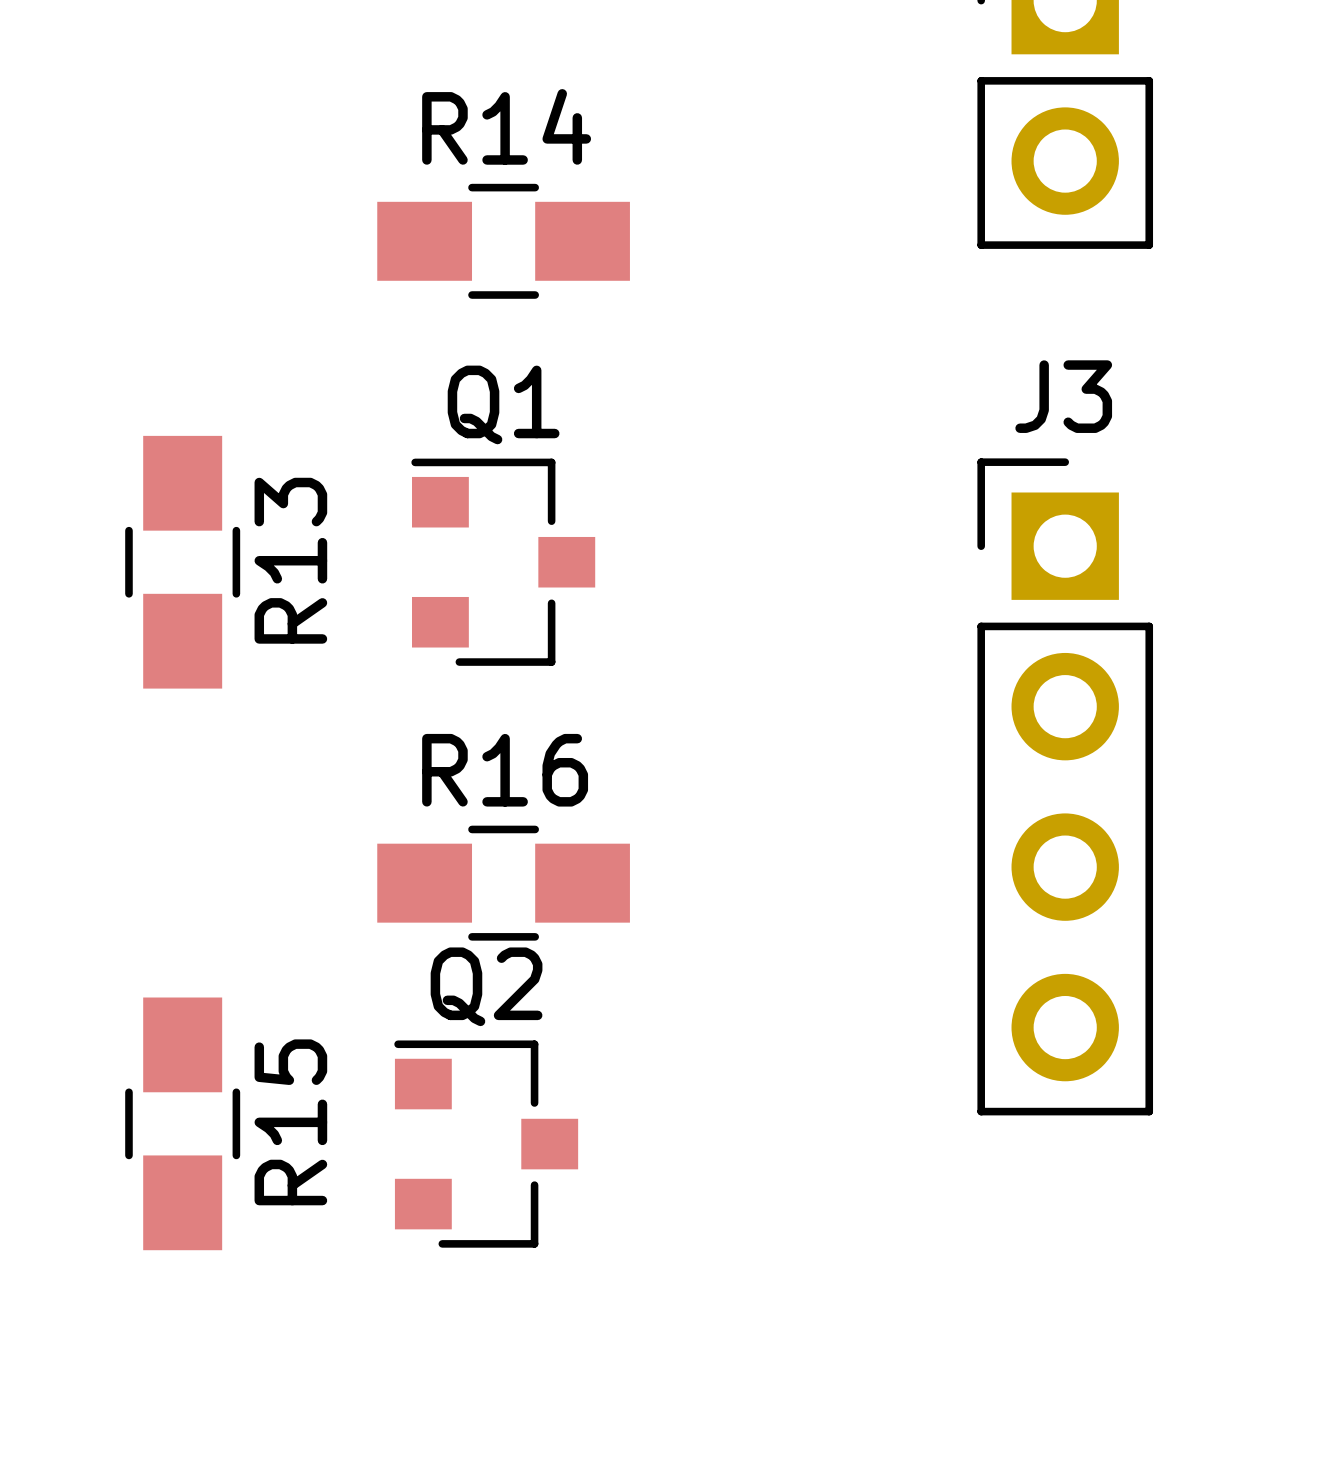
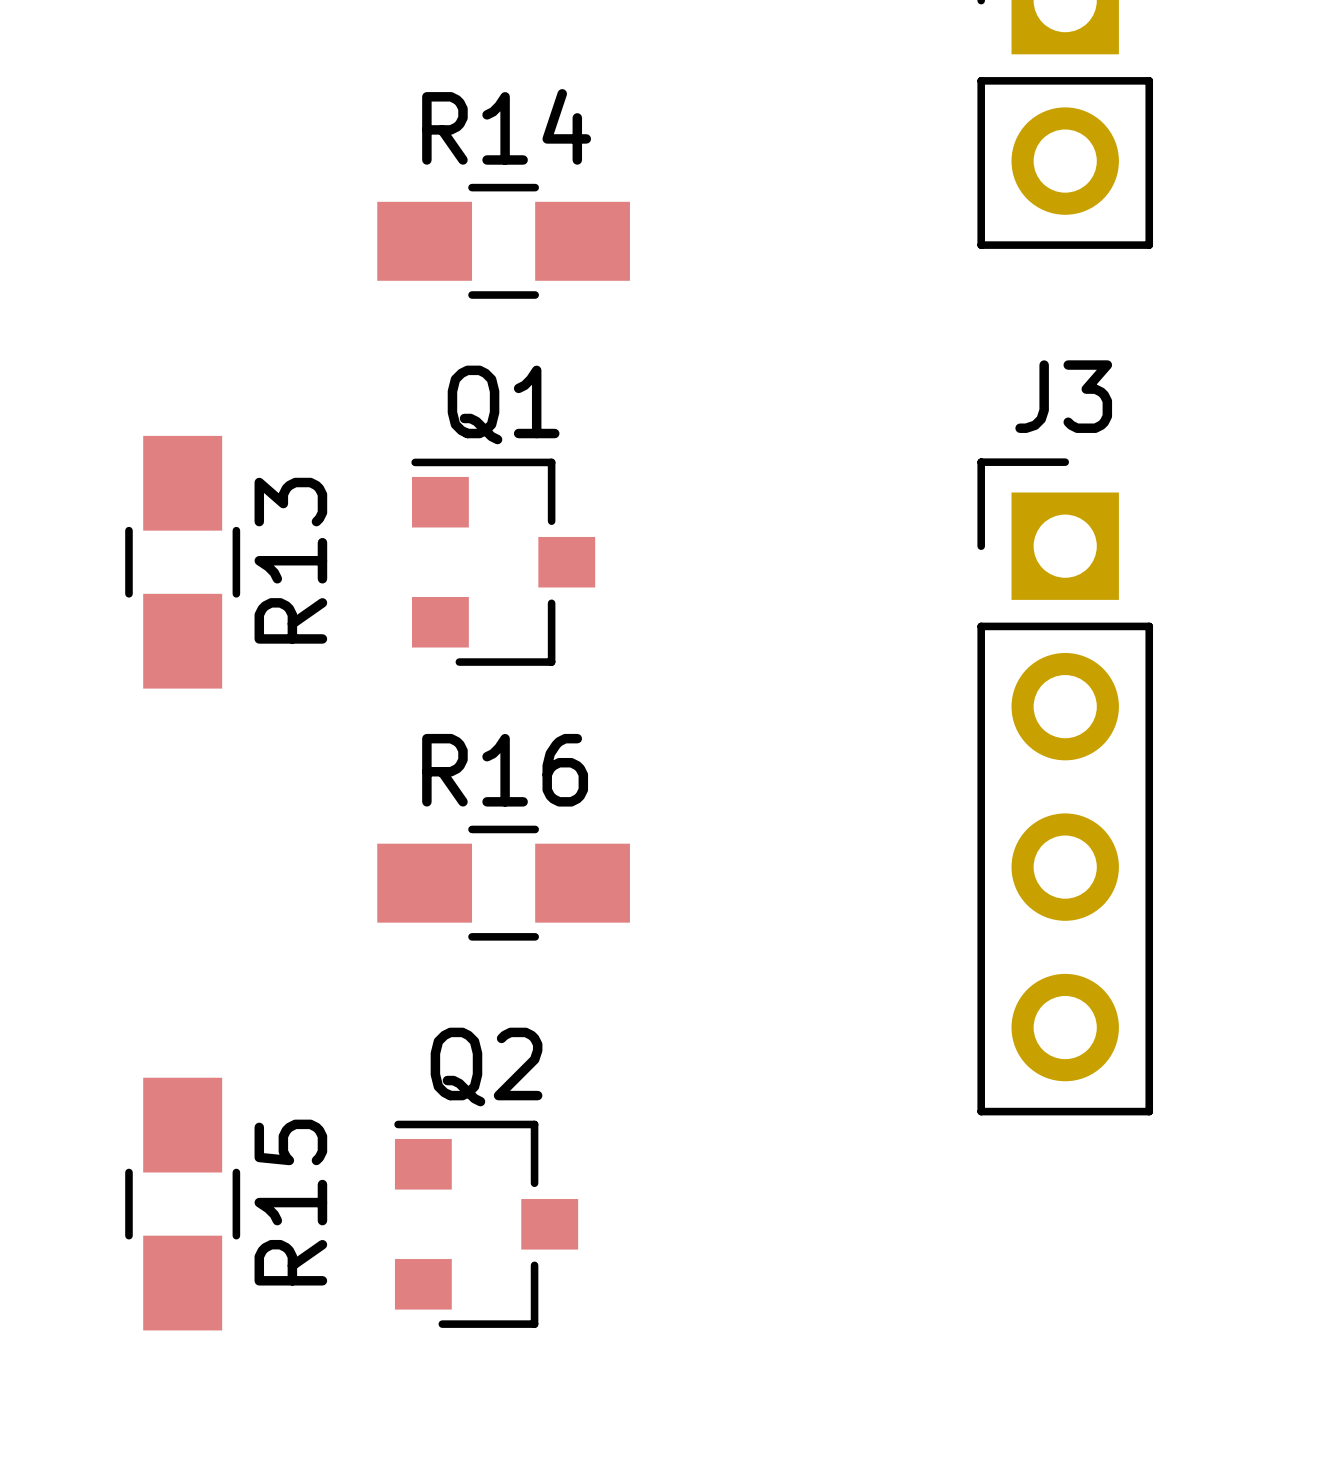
R15 position: (182, 1123) -> (182, 1204)
Q2 position: (486, 1144) -> (486, 1224)

